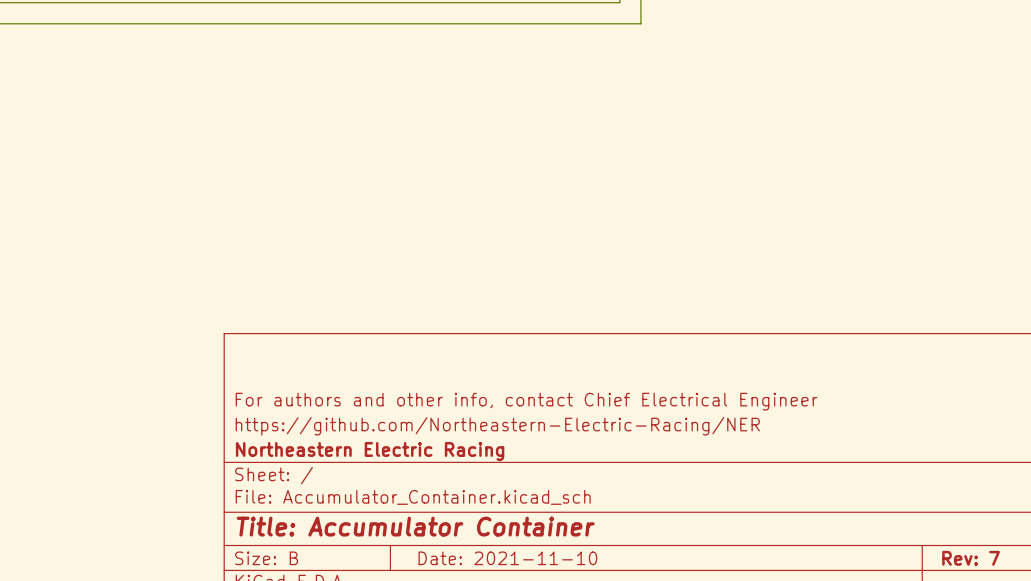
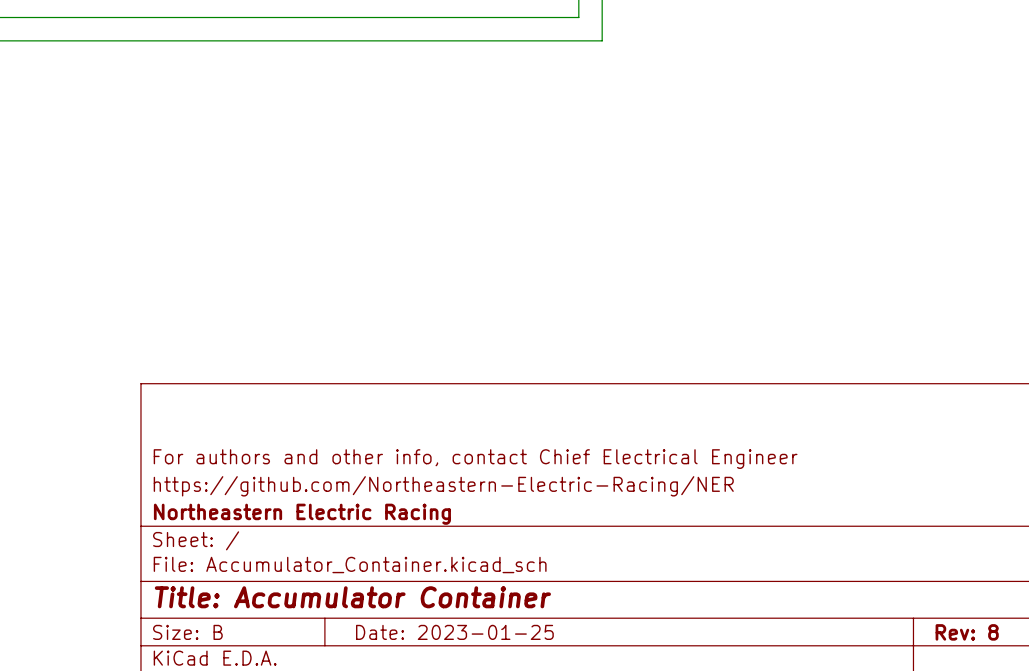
title block: Date: 2021-11-10 (507, 558) -> Date: 2023-01-25 (454, 632)
title block: Rev: 7 (971, 558) -> Rev: 8 (967, 632)

